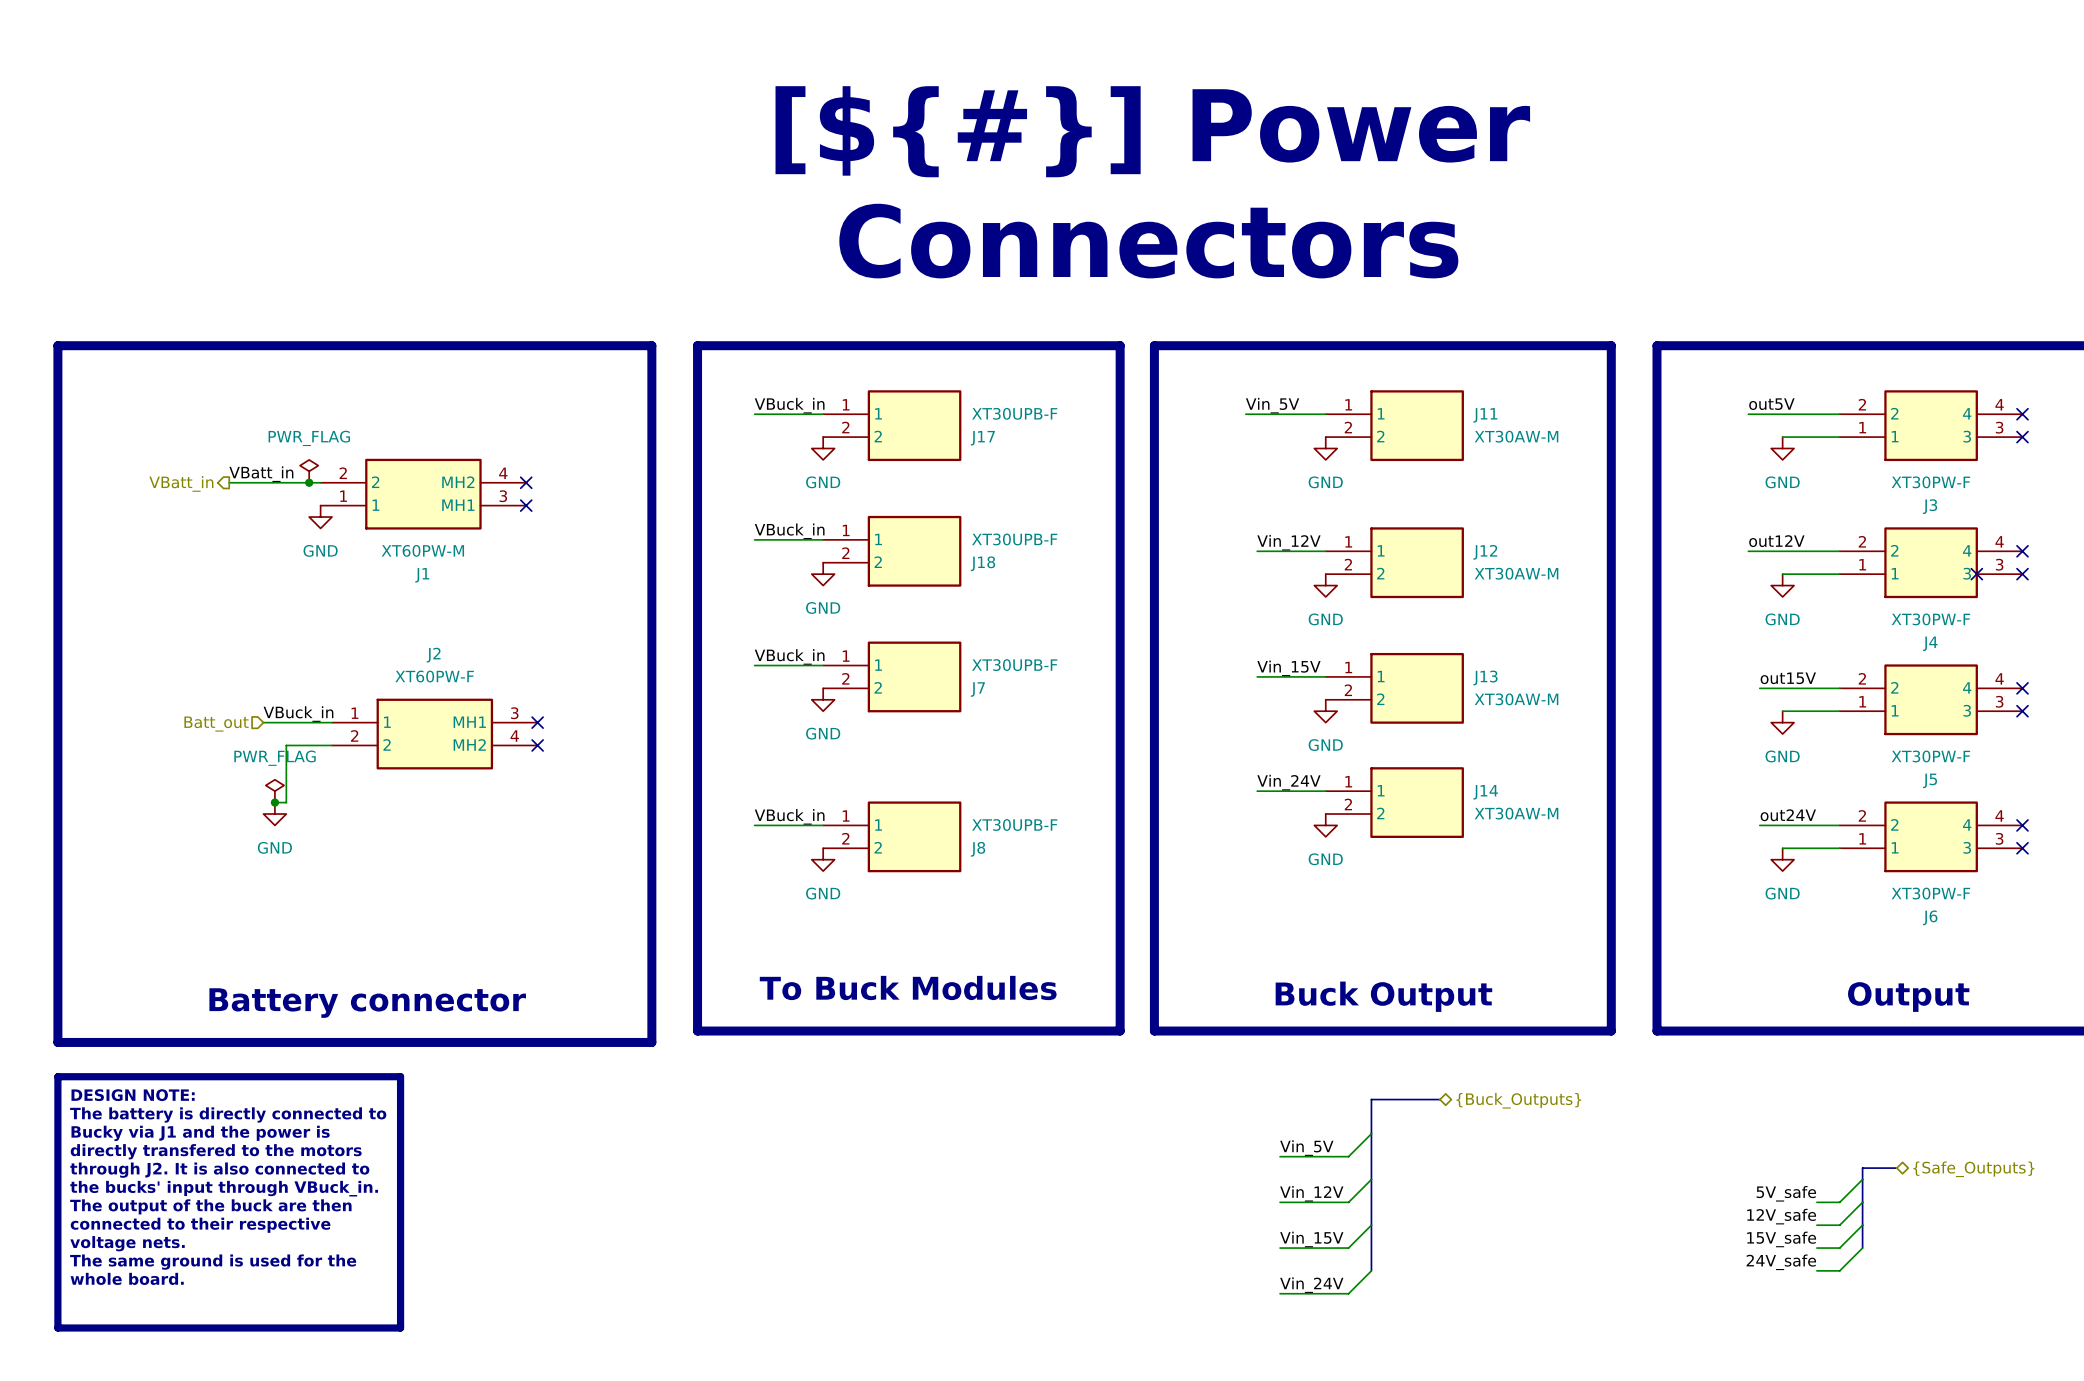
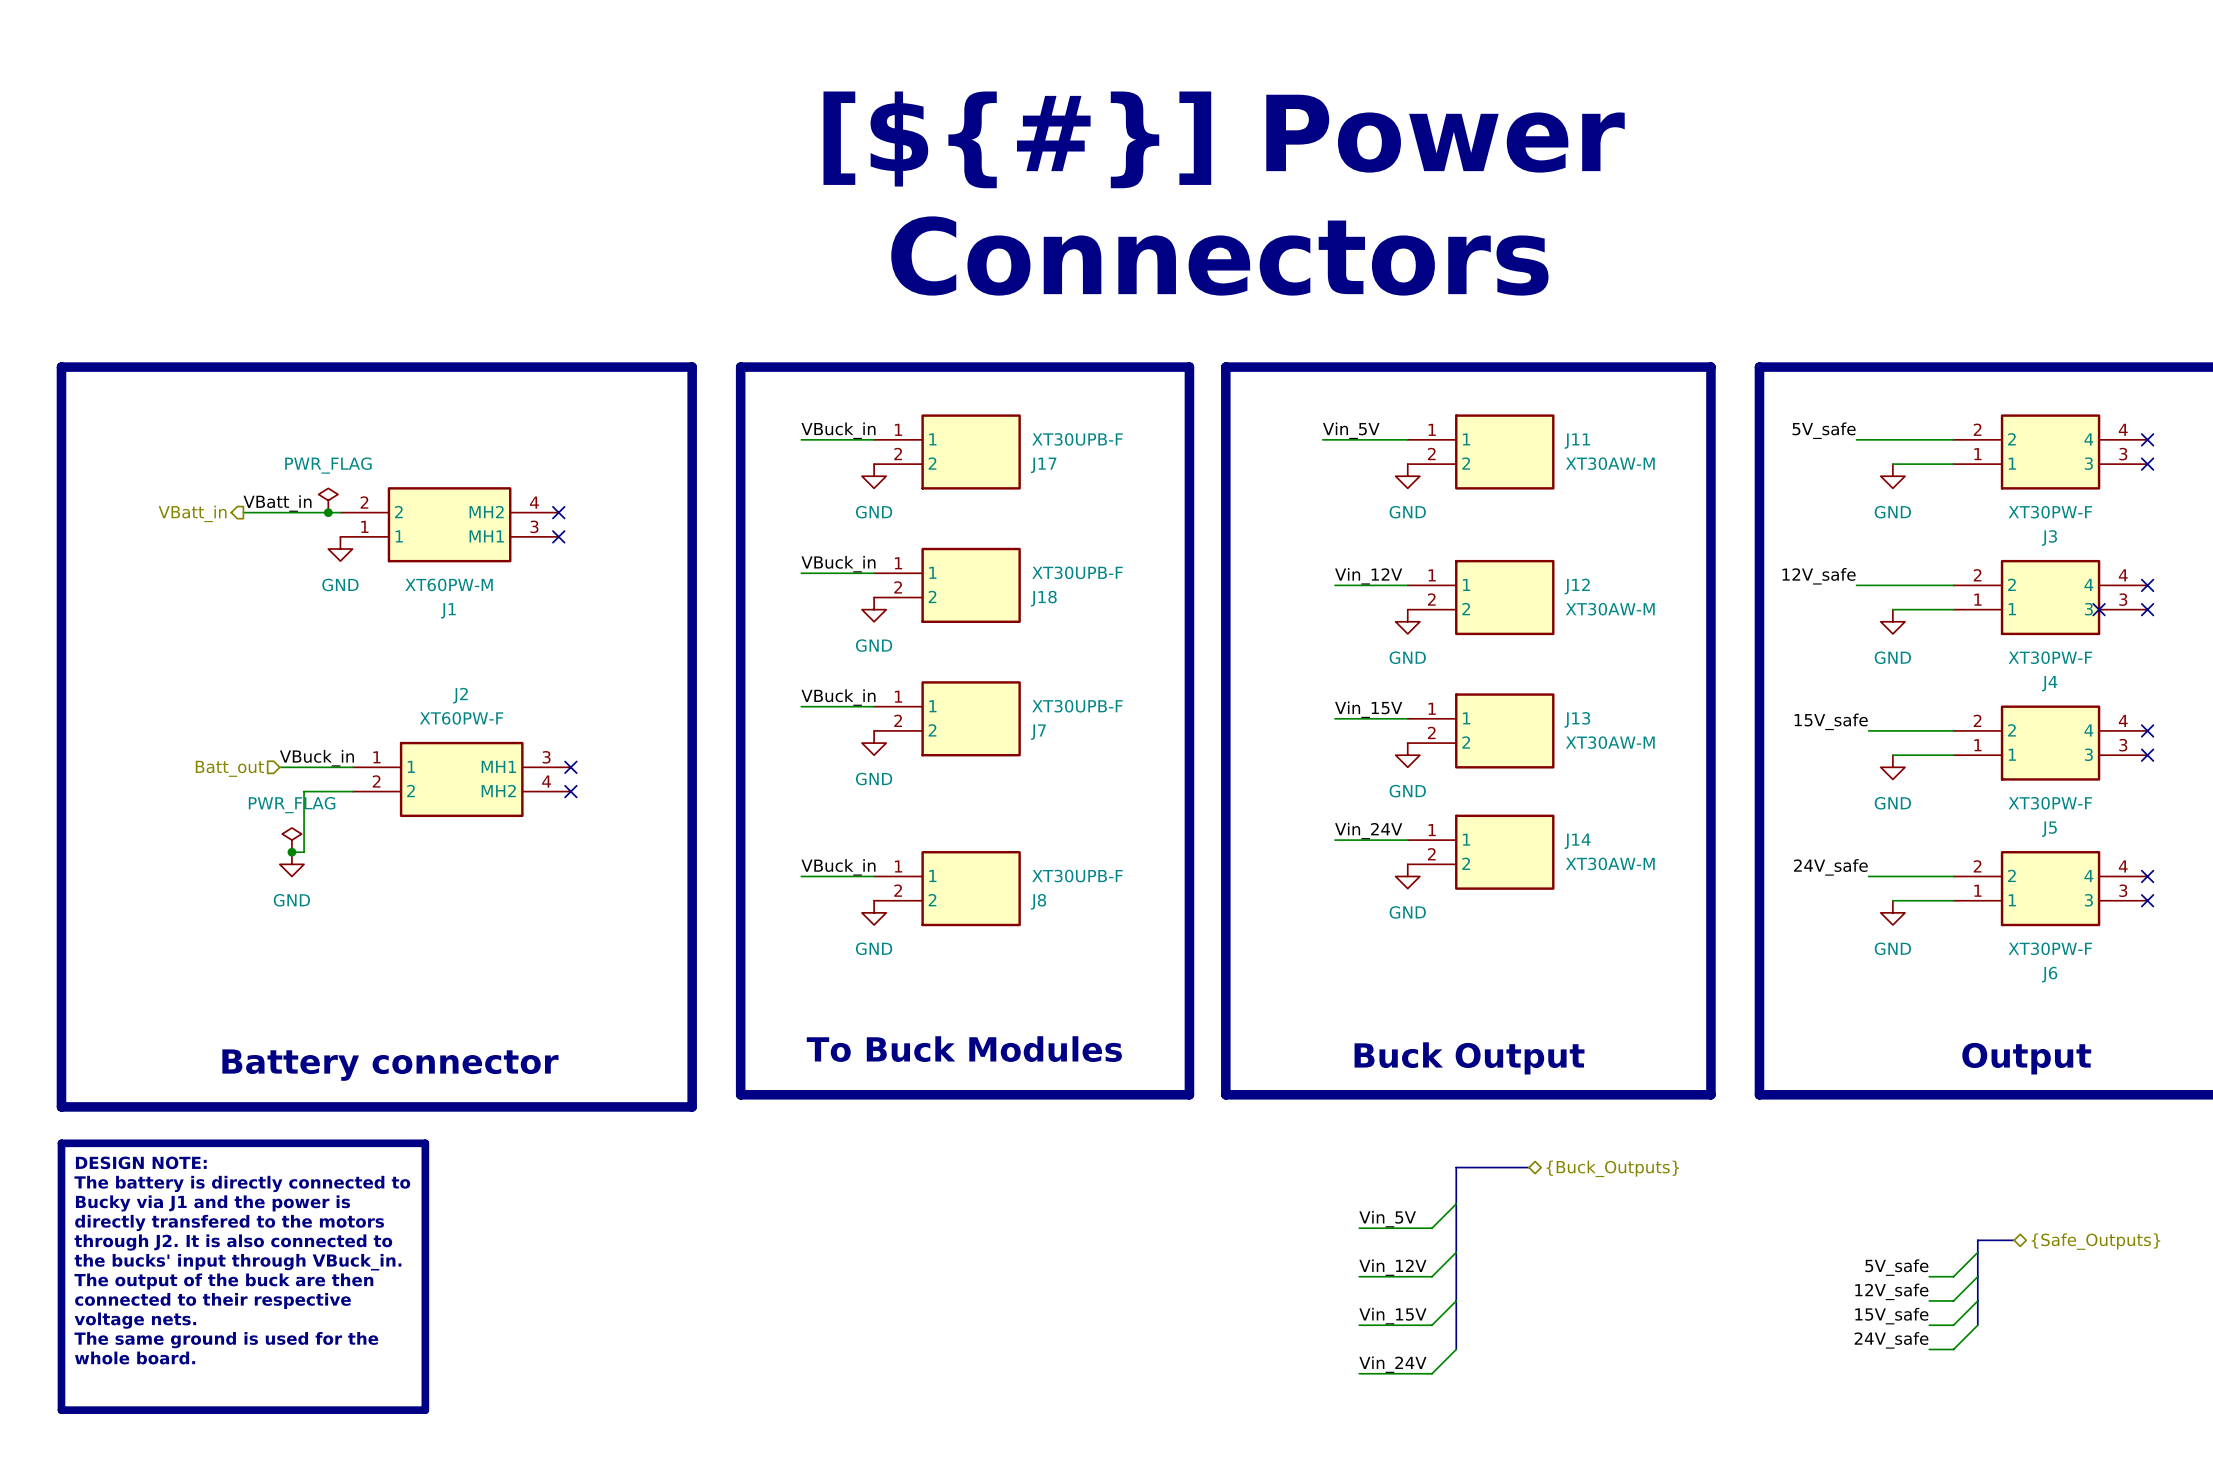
label: out5V (1771, 404) -> 5V_safe (1824, 430)
label: out12V (1776, 541) -> 12V_safe (1819, 576)
label: out15V (1788, 678) -> 15V_safe (1831, 721)
label: out24V (1788, 815) -> 24V_safe (1830, 867)

